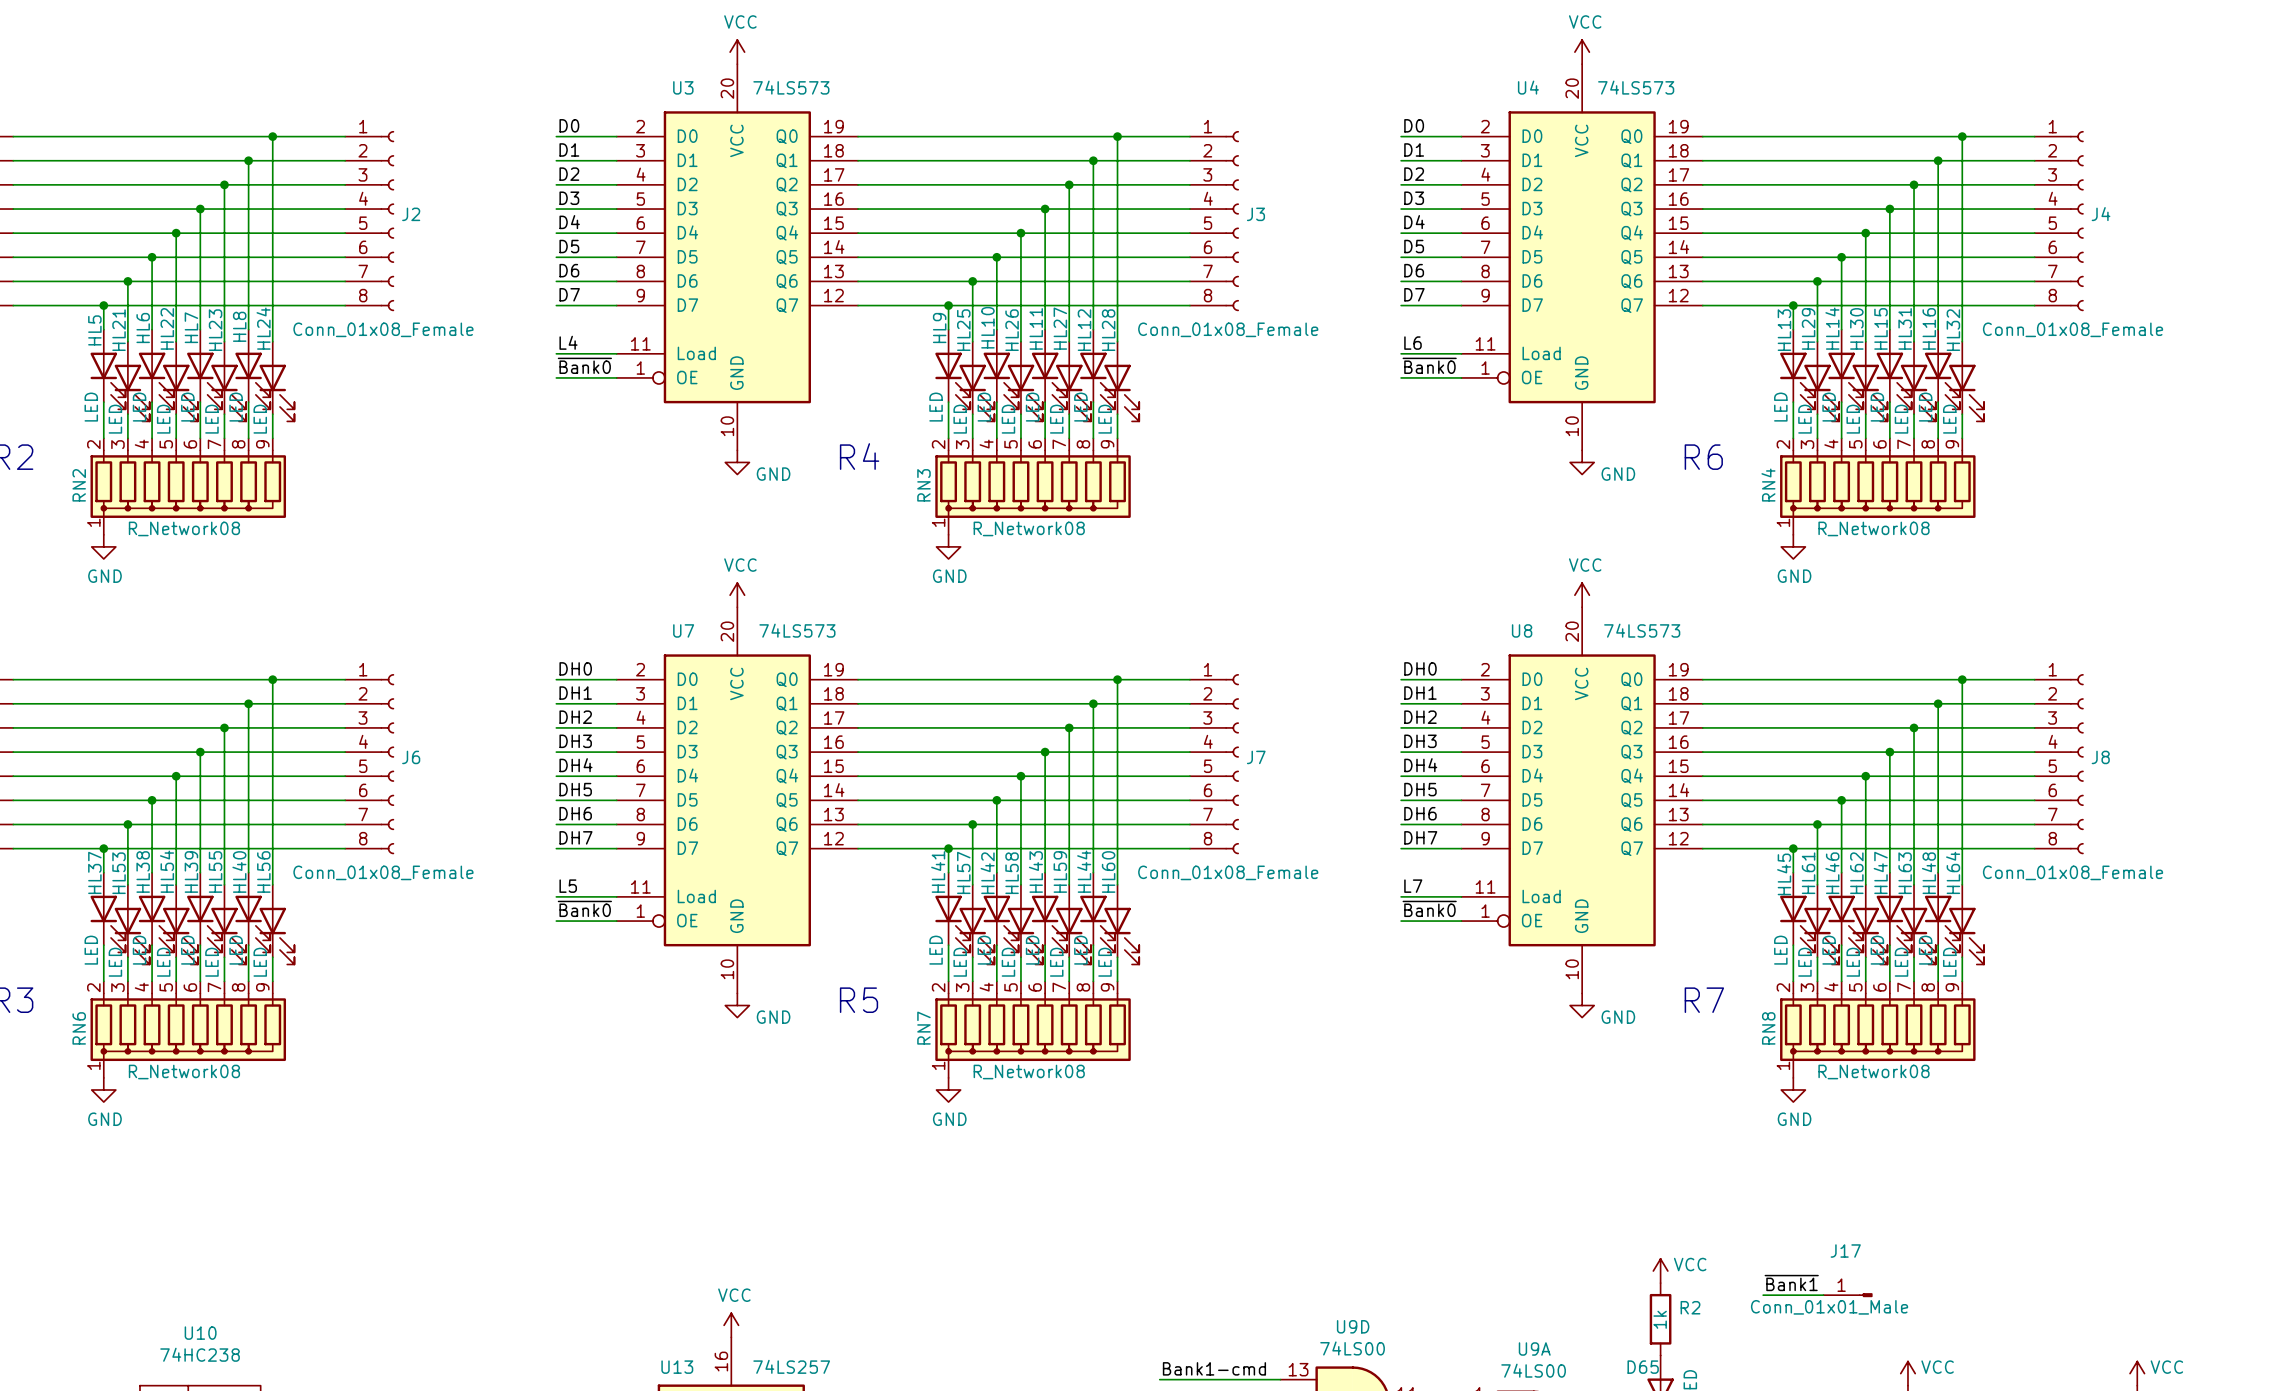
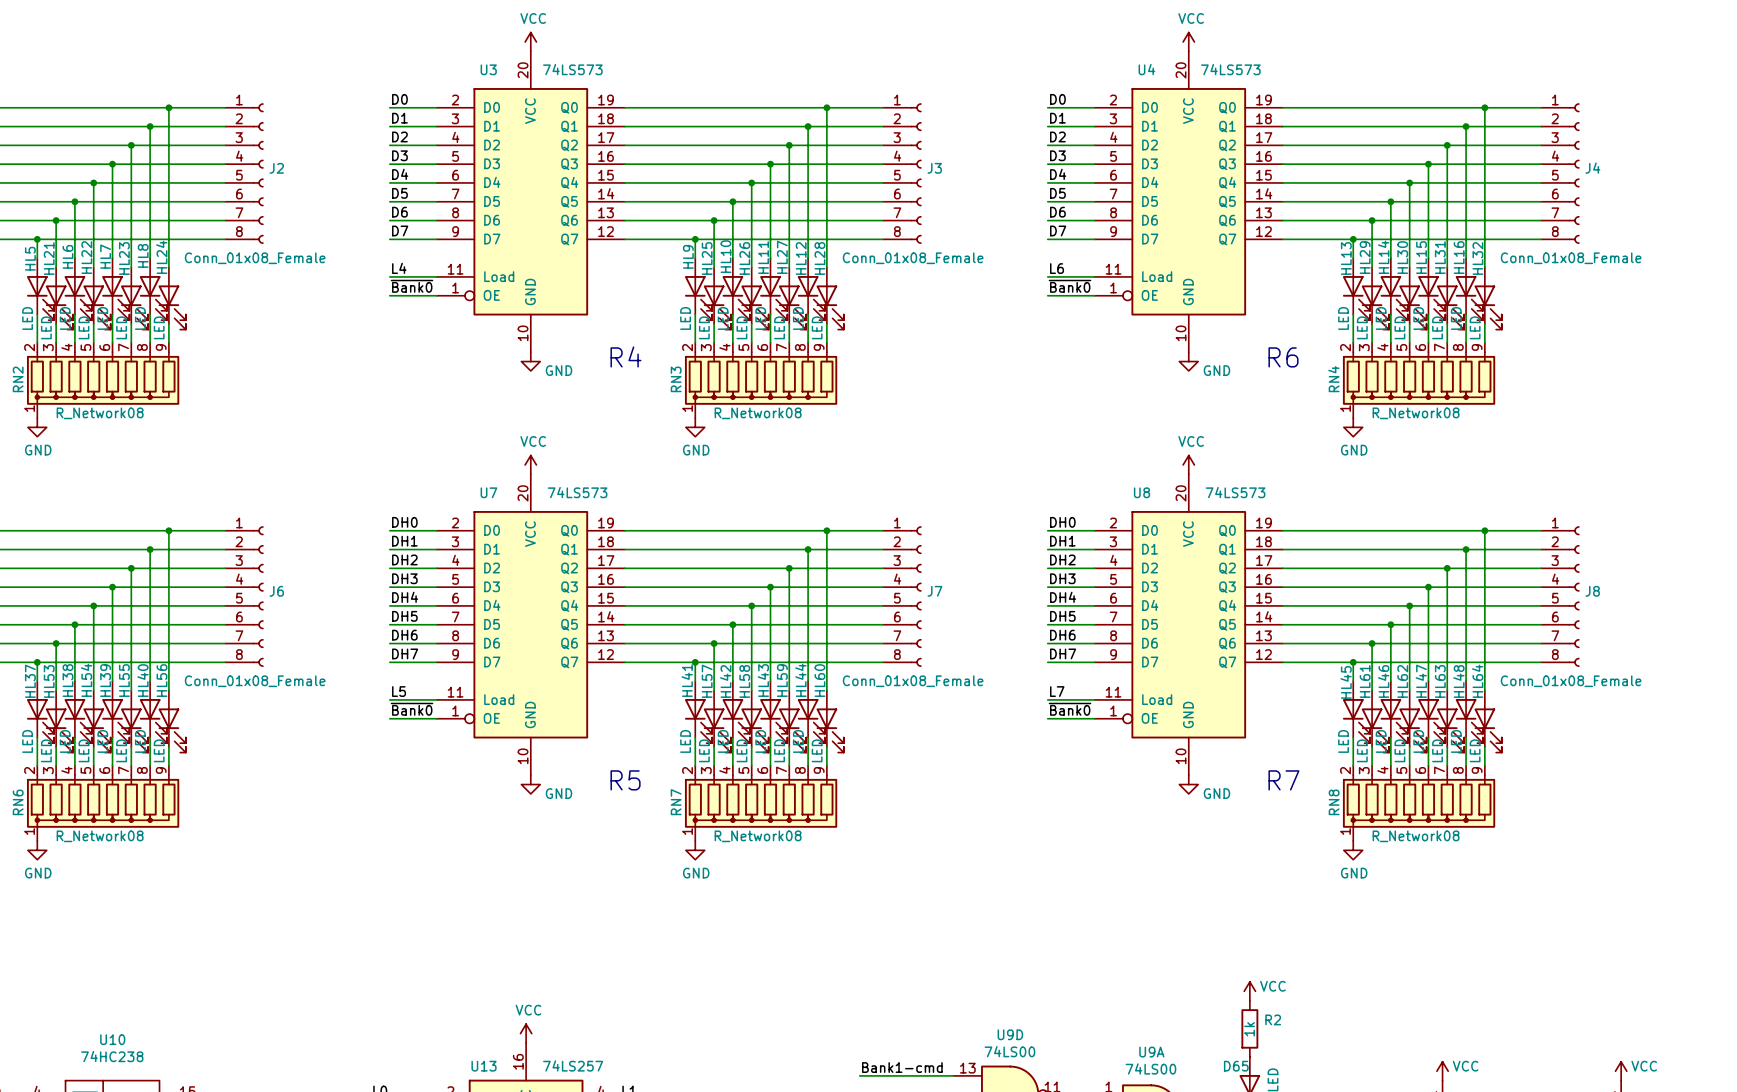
label: ~{Bank1} (1791, 1283) -> none
wire: (1763, 1295) (1823, 1295) -> none
J17: Conn_01x01_Male (1848, 1295) -> none

